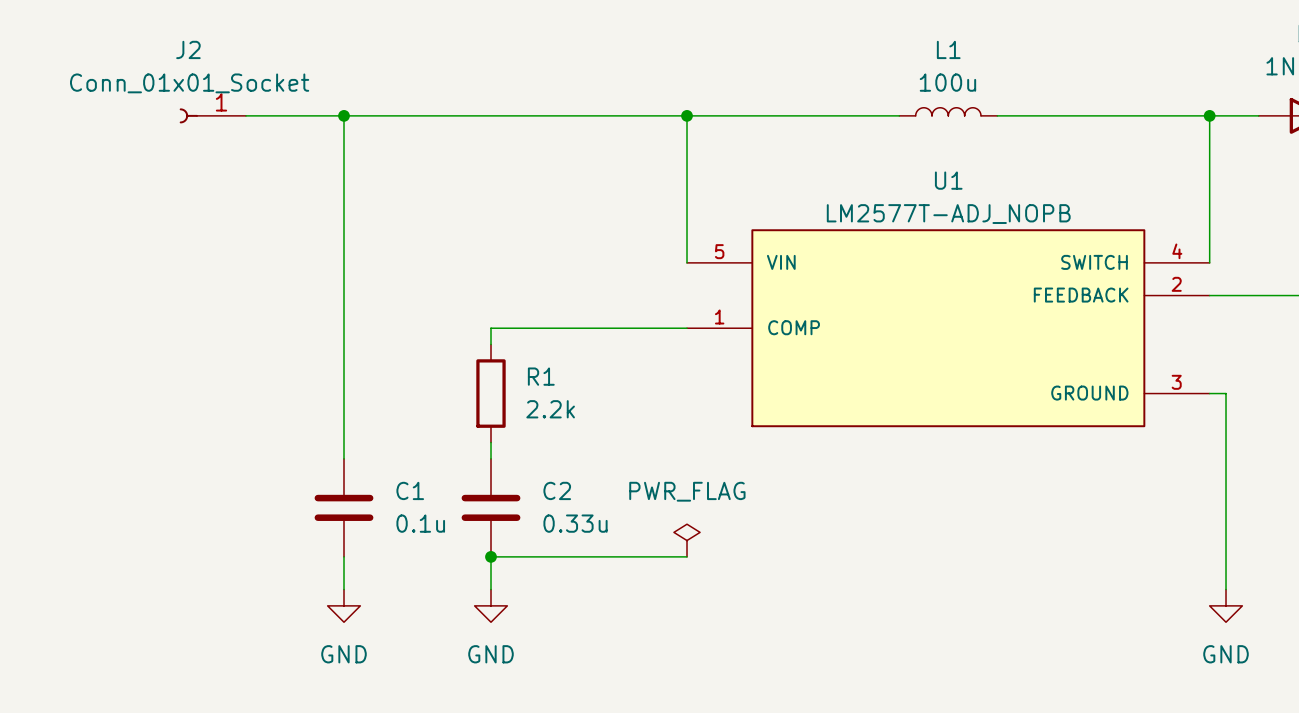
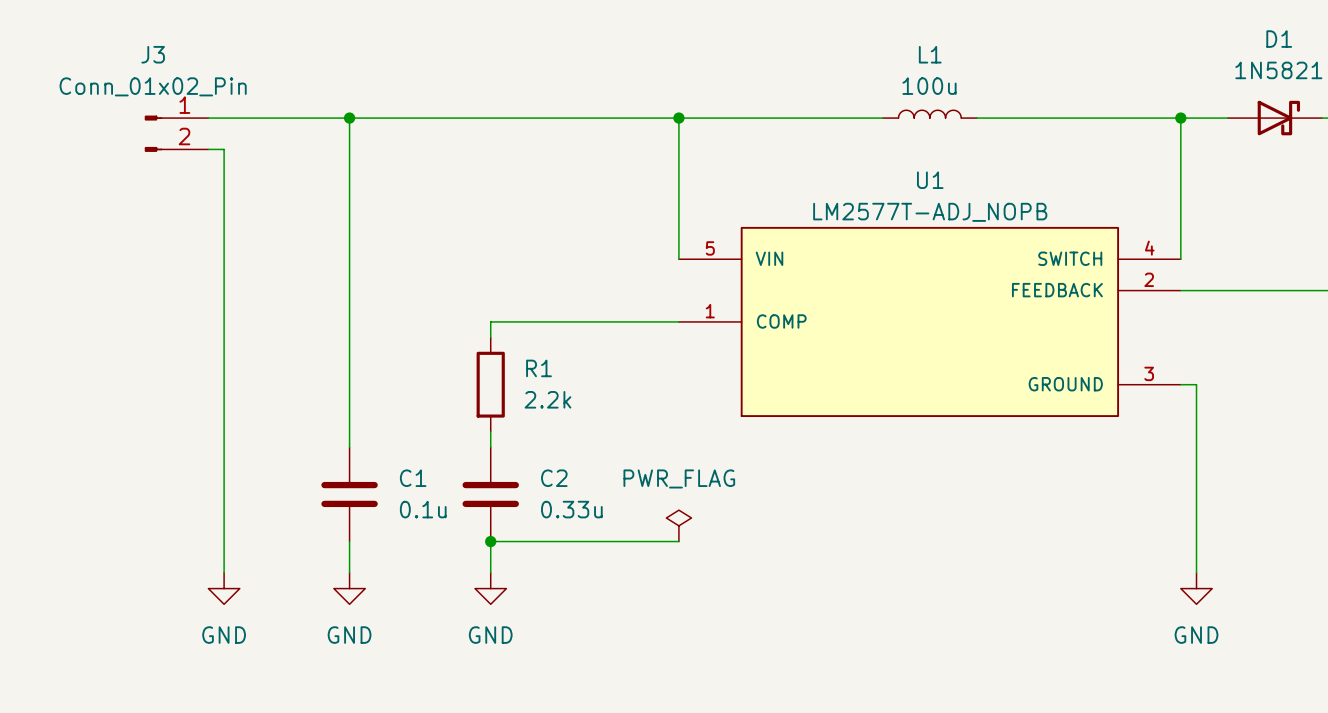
J2: Conn_01x01_Socket (212, 115) -> none
J3: none -> Conn_01x02_Pin (176, 133)
wire: none -> (208, 149) (224, 149) (224, 572)
power symbol: none -> GND (224, 588)

